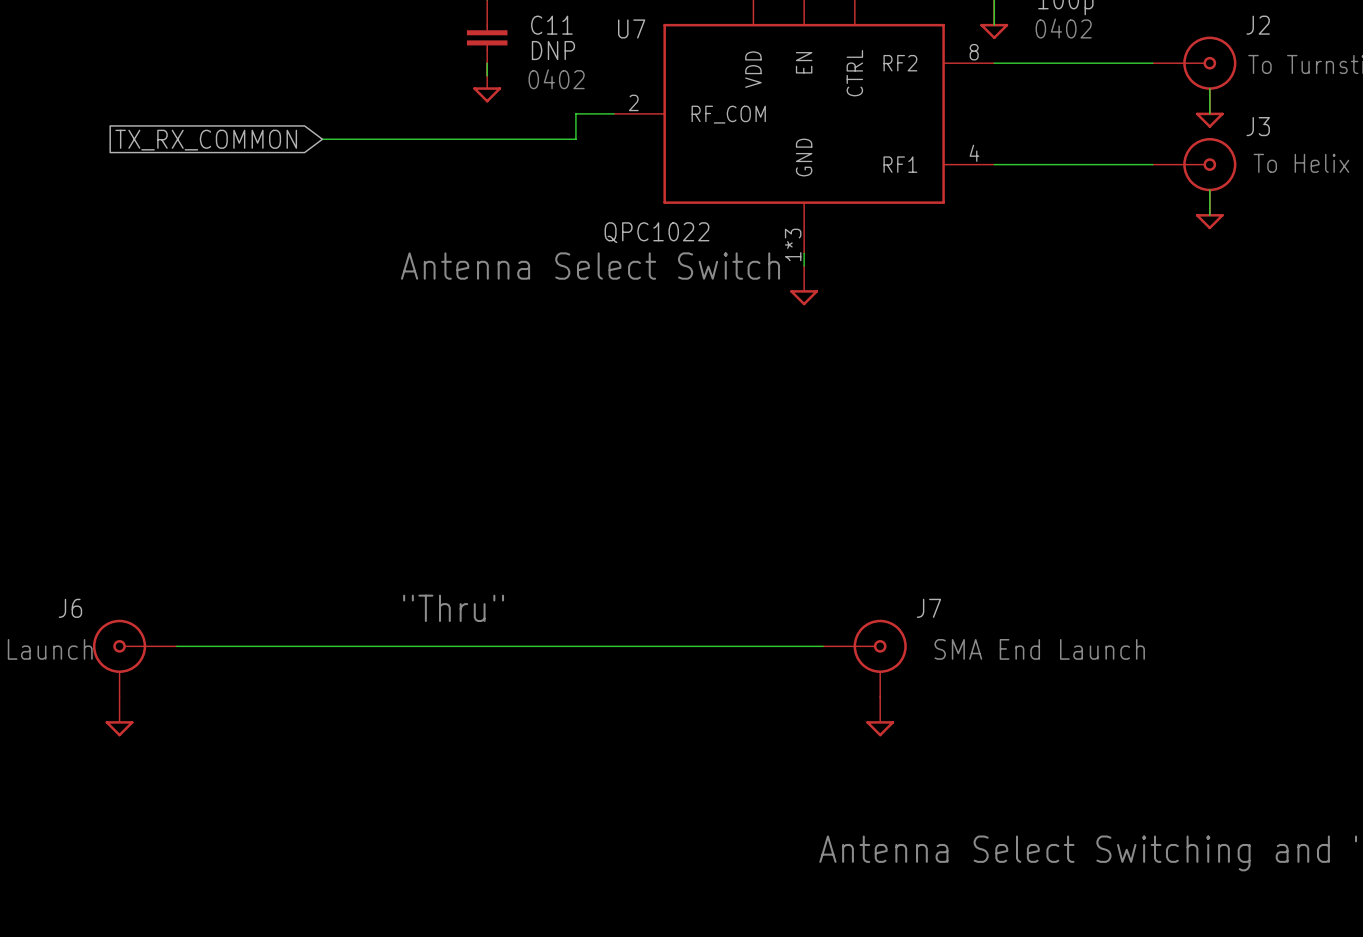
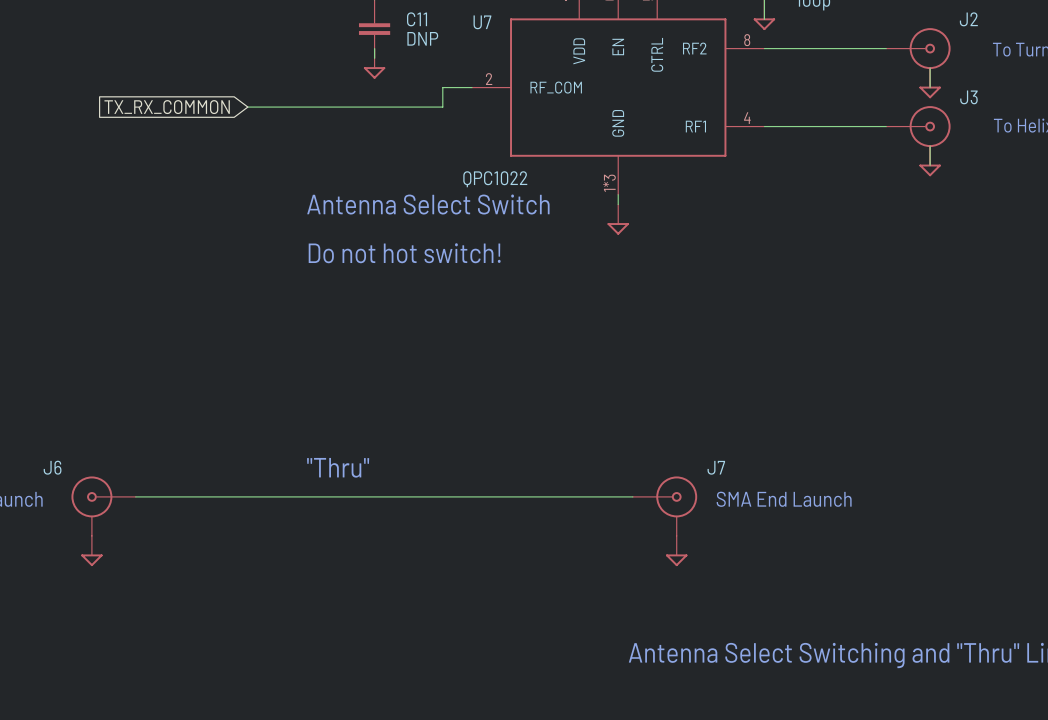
text: 0402 (1063, 28) -> none
text: 0402 (556, 79) -> none
text: none -> Do not hot switch! (404, 253)

